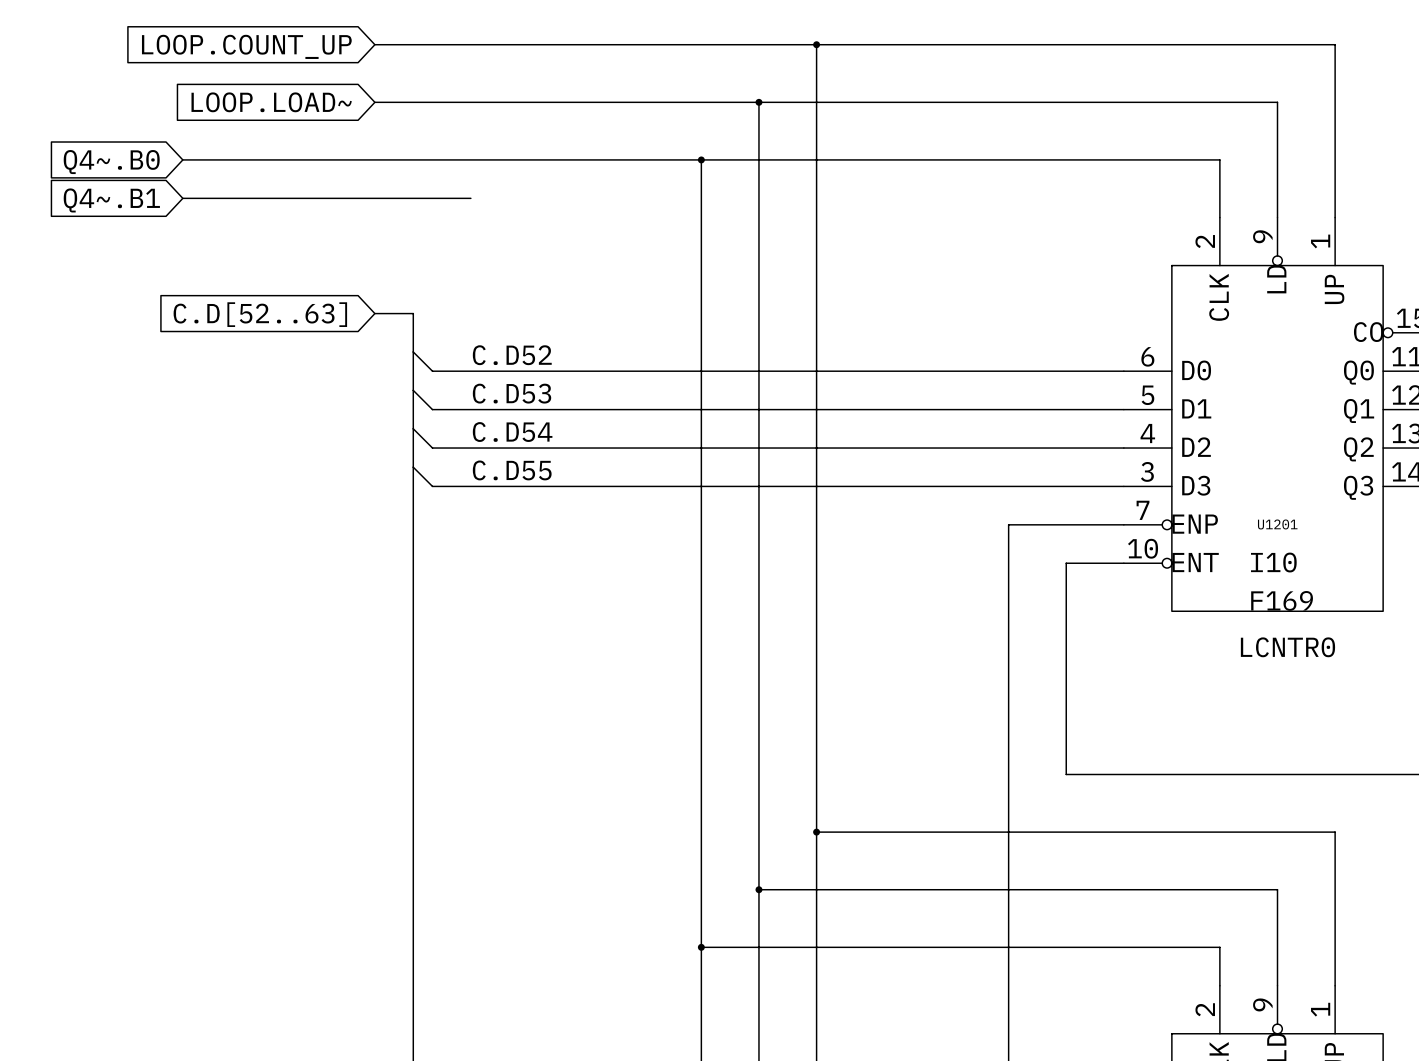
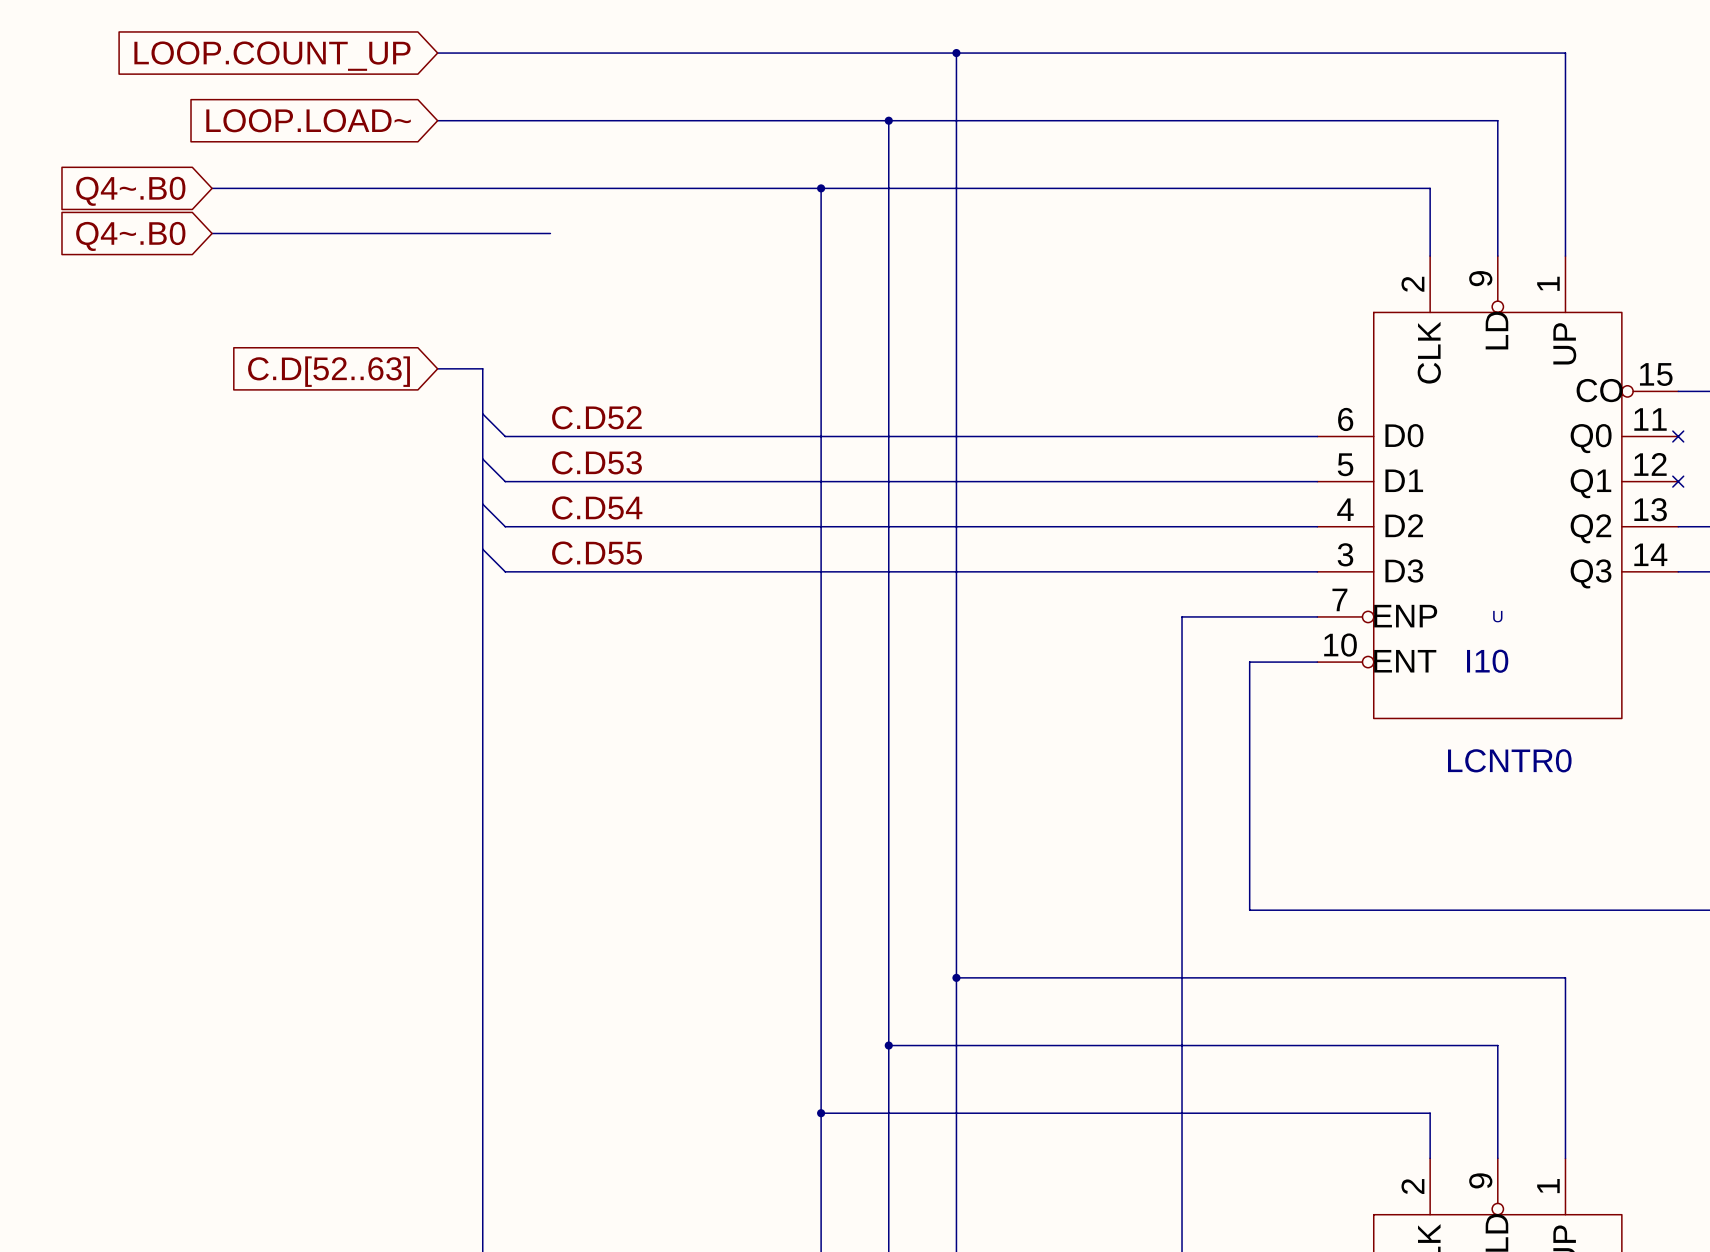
global label: Q4~.B1 (111, 200) -> Q4~.B0 (130, 236)
U1201 name: U1201 (1277, 524) -> U (1497, 616)
U1201 value: F169 (1282, 600) -> none

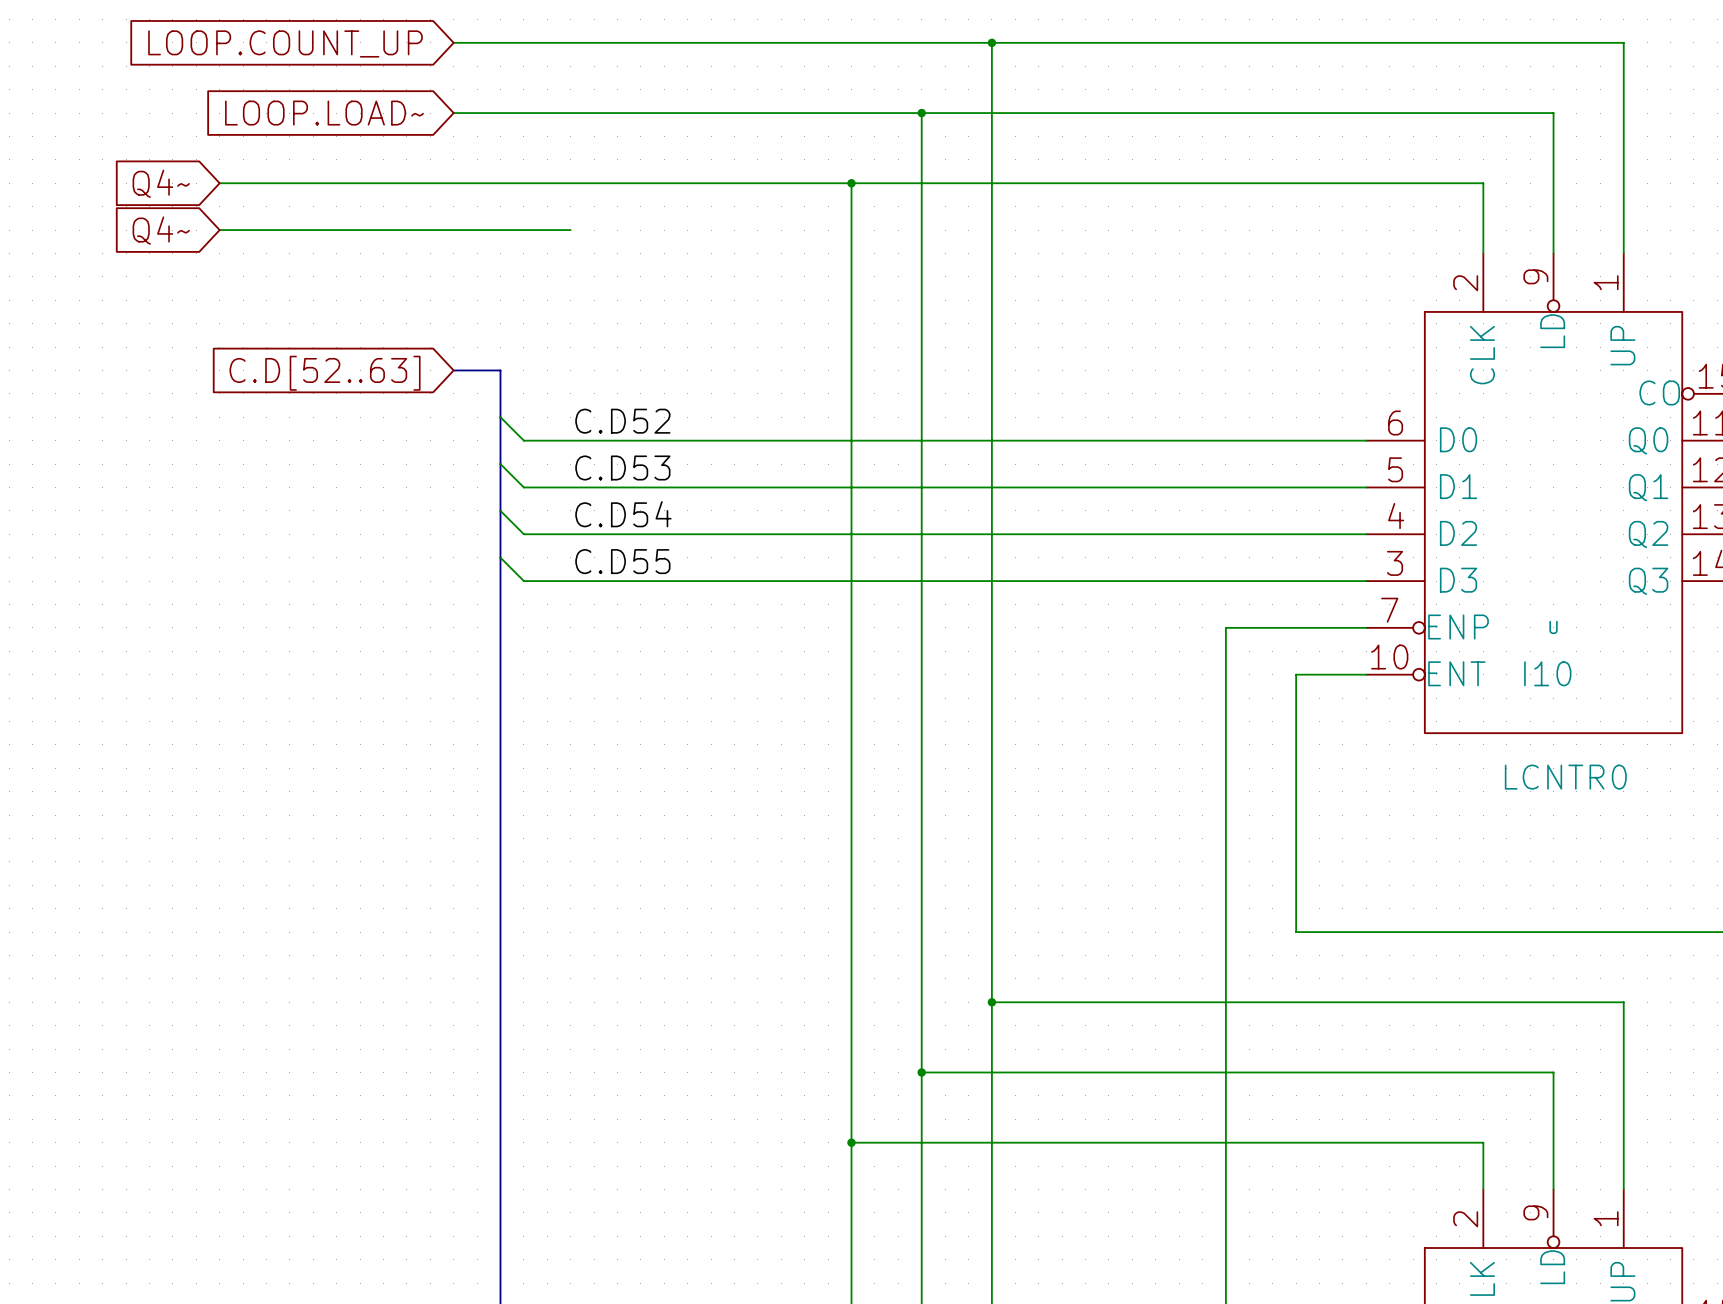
global label: Q4~.B0 (130, 191) -> Q4~ (161, 183)
global label: Q4~.B0 (130, 236) -> Q4~ (161, 230)

